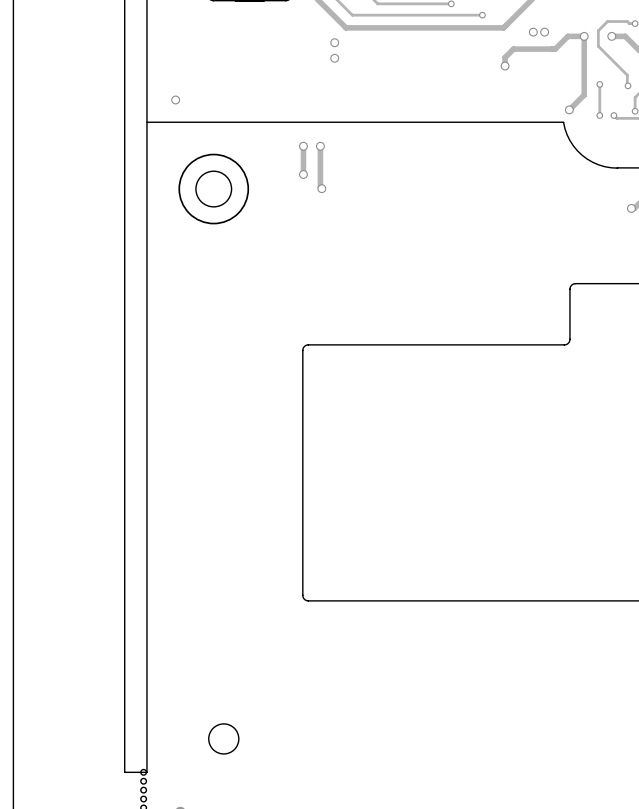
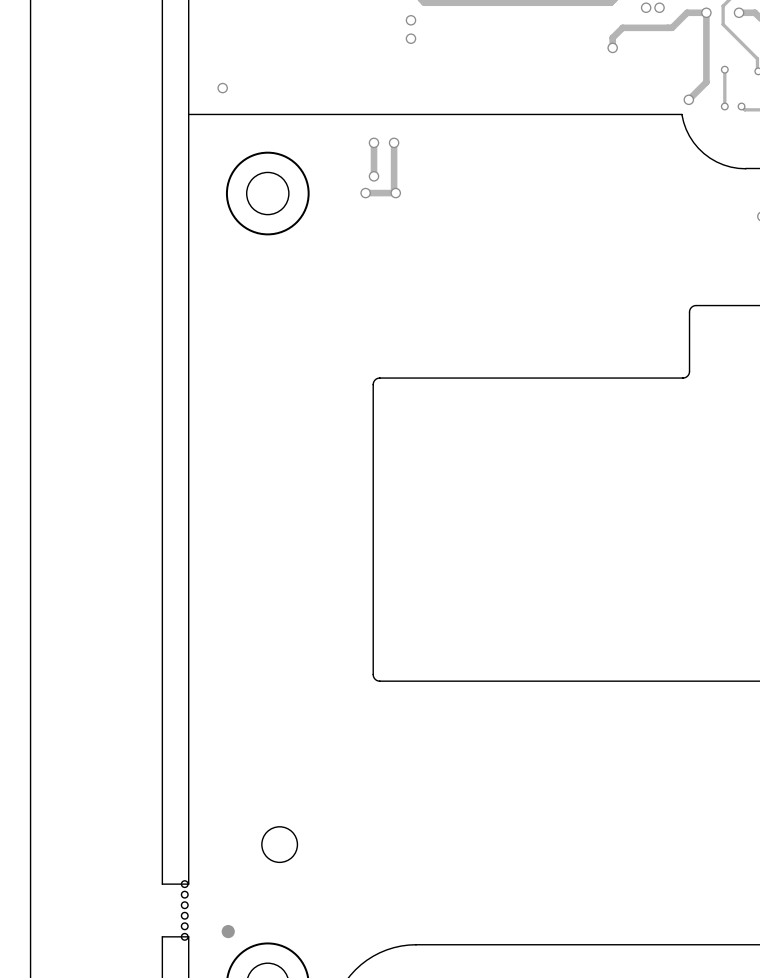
track: none -> (365, 193) (395, 193)
via: none -> (365, 193)

